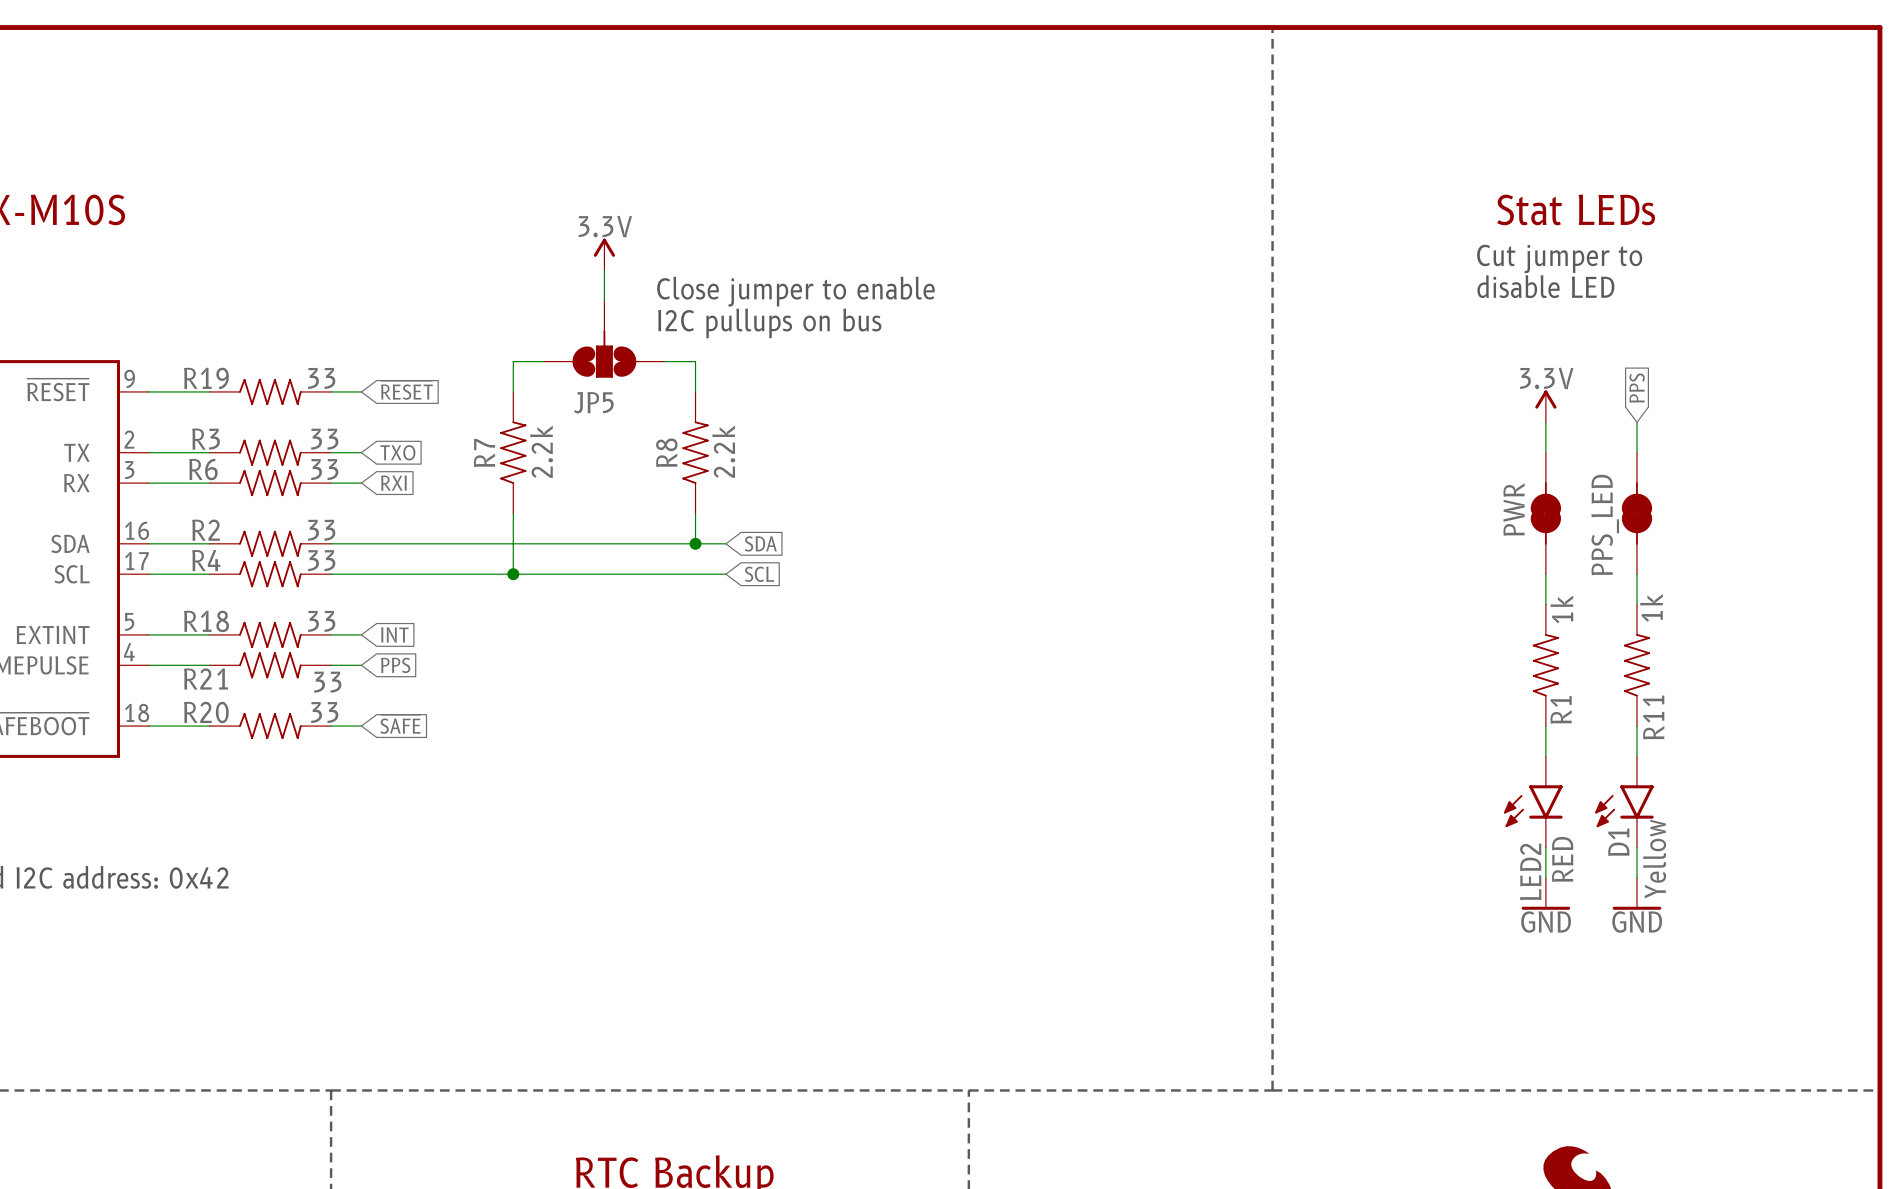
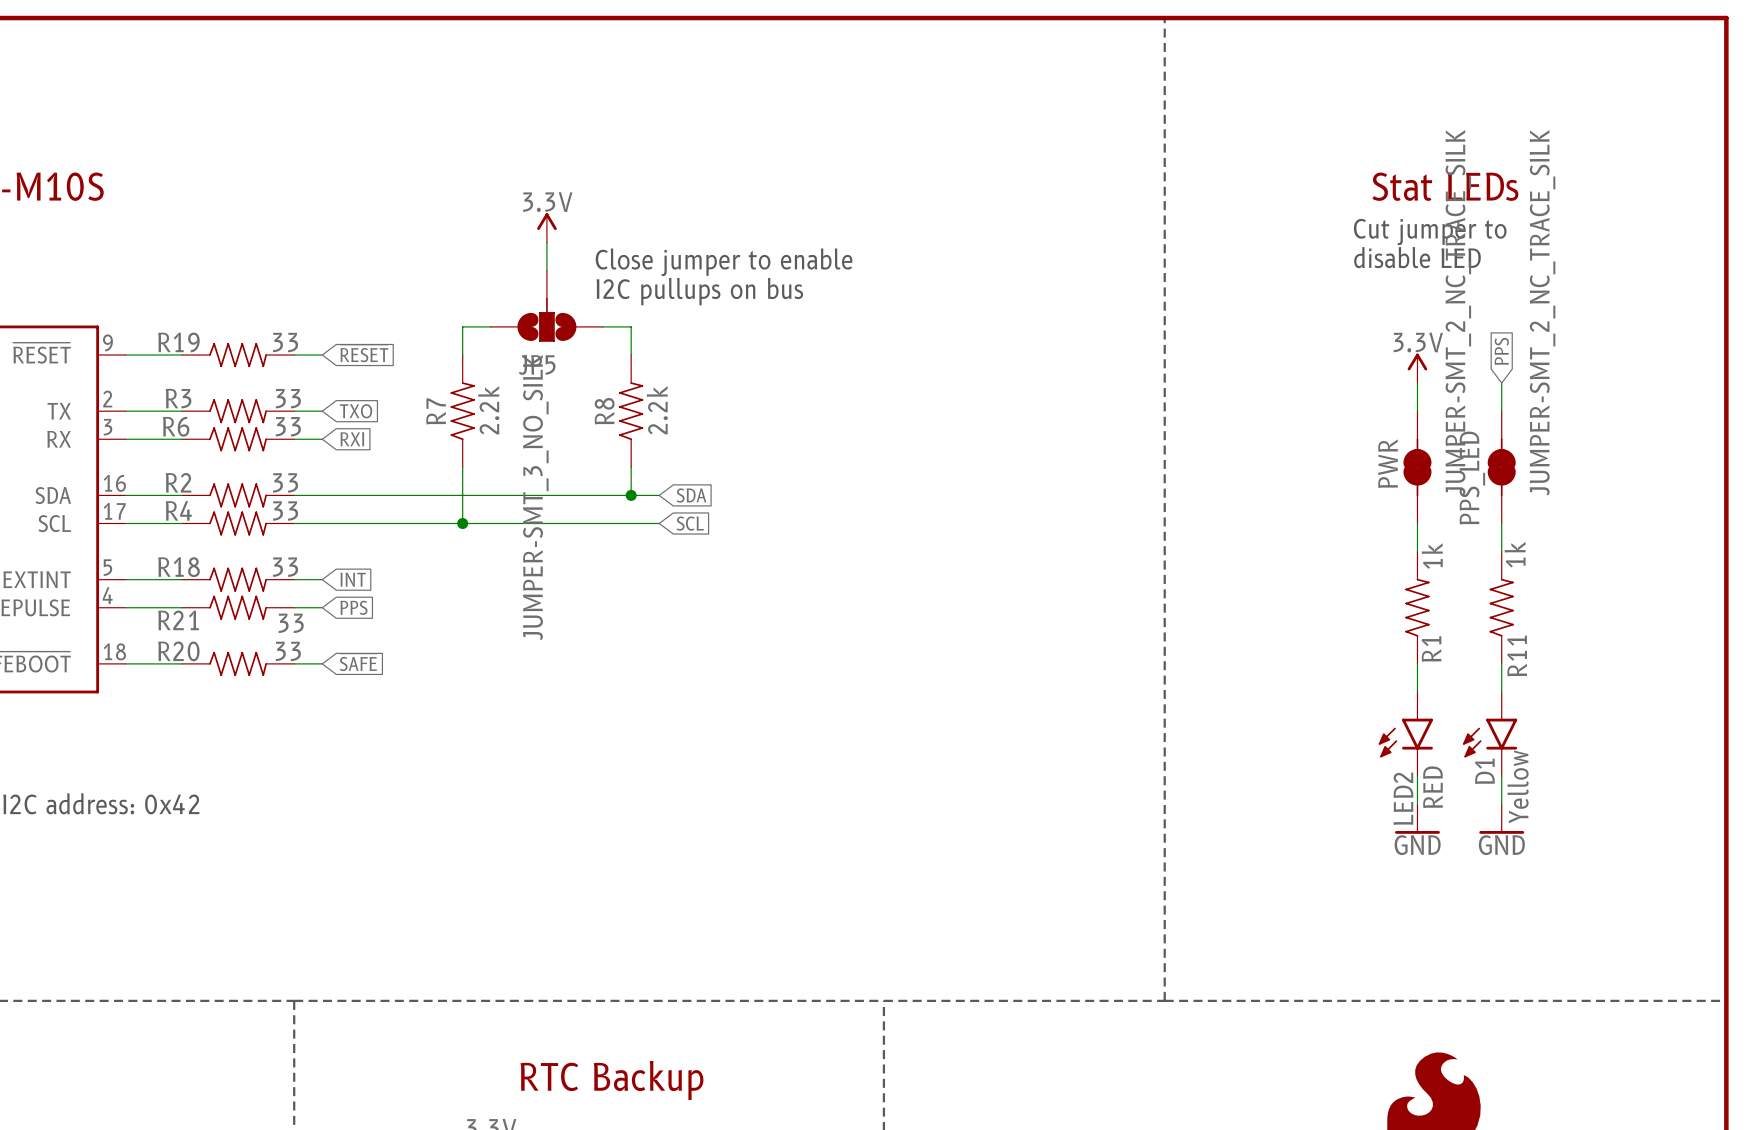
PWR value: none -> JUMPER-SMT_2_NC_TRACE_SILK (1458, 312)
PPS_LED value: none -> JUMPER-SMT_2_NC_TRACE_SILK (1542, 312)
JP5 value: none -> JUMPER-SMT_3_NO_SILK (535, 497)

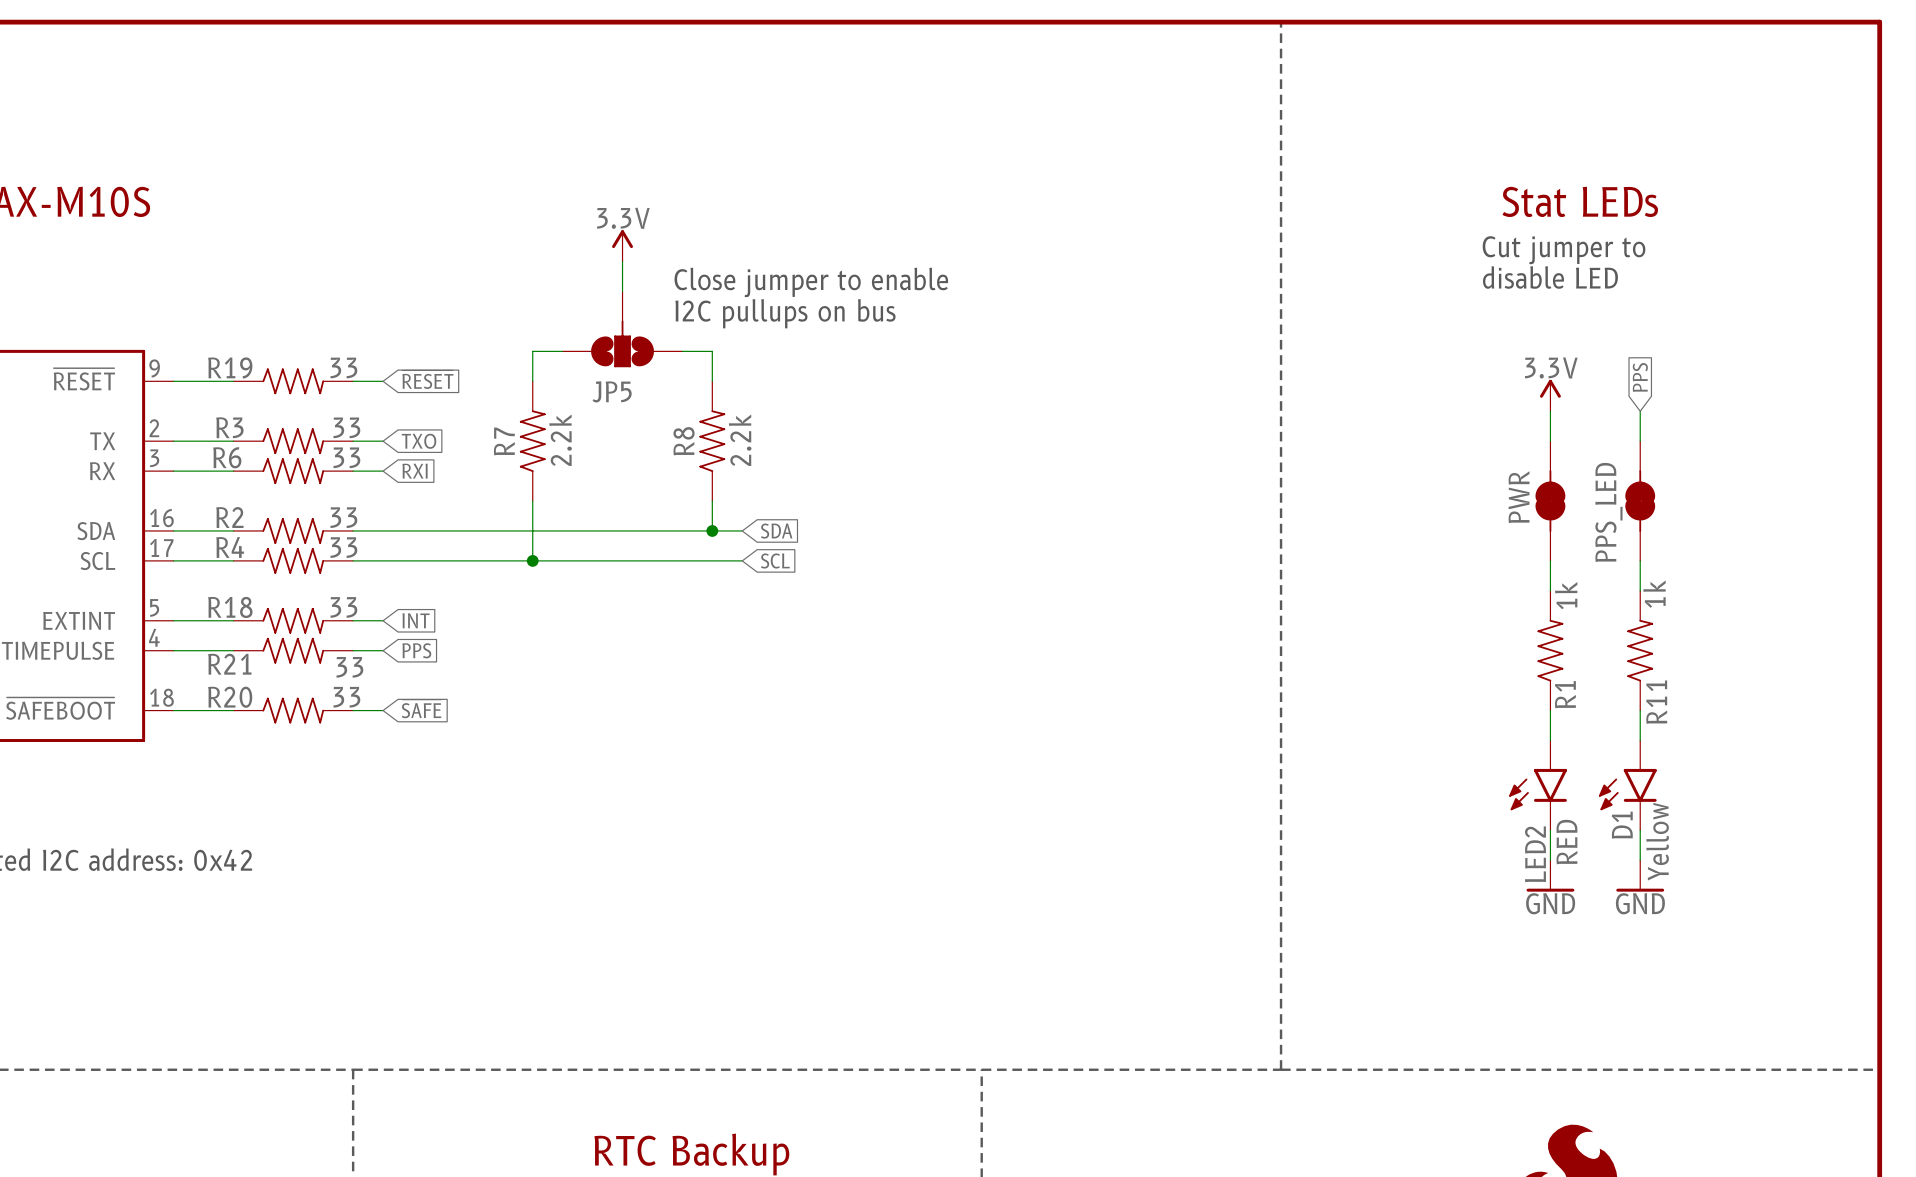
PWR value: JUMPER-SMT_2_NC_TRACE_SILK (1458, 312) -> none
PPS_LED value: JUMPER-SMT_2_NC_TRACE_SILK (1542, 312) -> none
JP5 value: JUMPER-SMT_3_NO_SILK (535, 497) -> none

